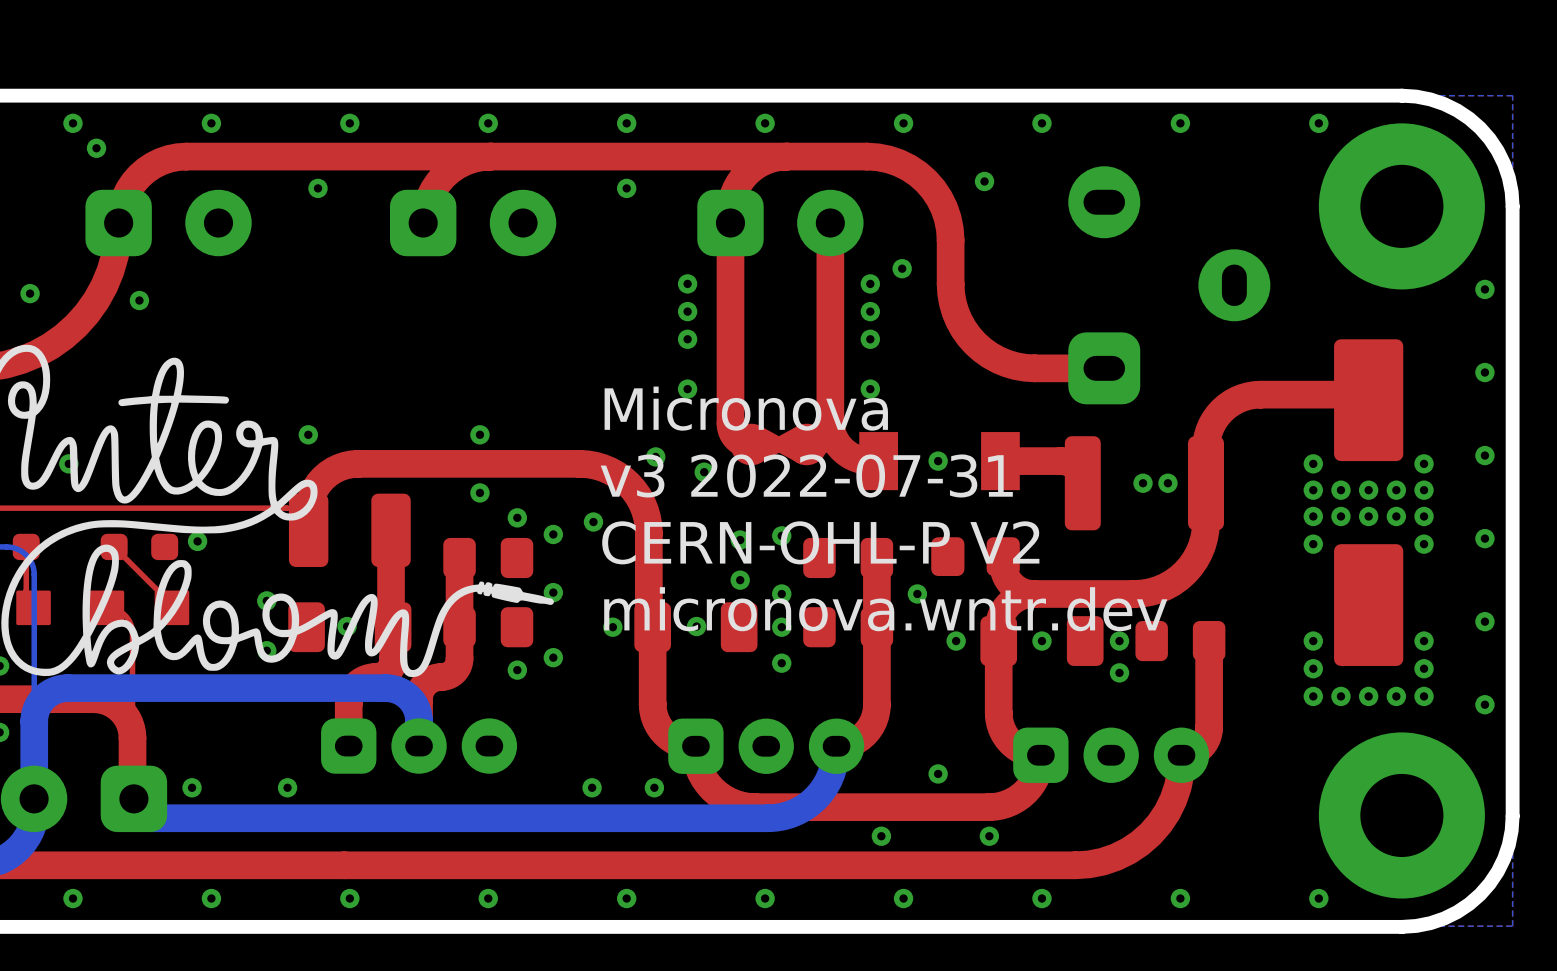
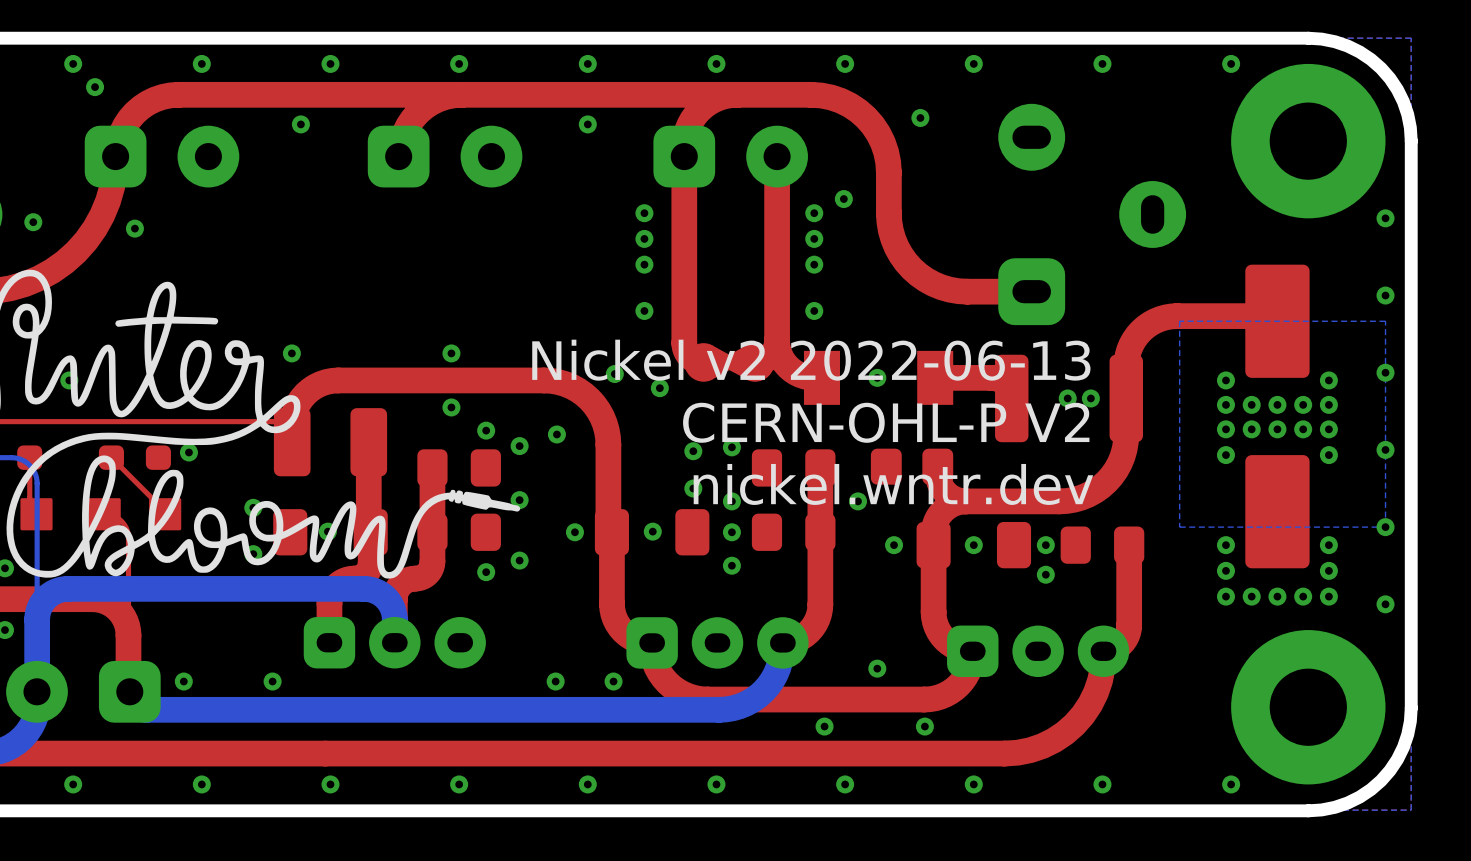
bottom zone outline: none -> (1385, 321) (1385, 527) (1179, 527) (1179, 321) (1385, 321)
text: Micronova (746, 408) -> none
text: v3 2022-07-31 (806, 475) -> Nickel v2 2022-06-13 (811, 360)
text position: CERN-OHL-P V2 (820, 542) -> CERN-OHL-P V2 (886, 422)
text: micronova.wntr.dev (885, 609) -> nickel.wntr.dev (893, 484)

